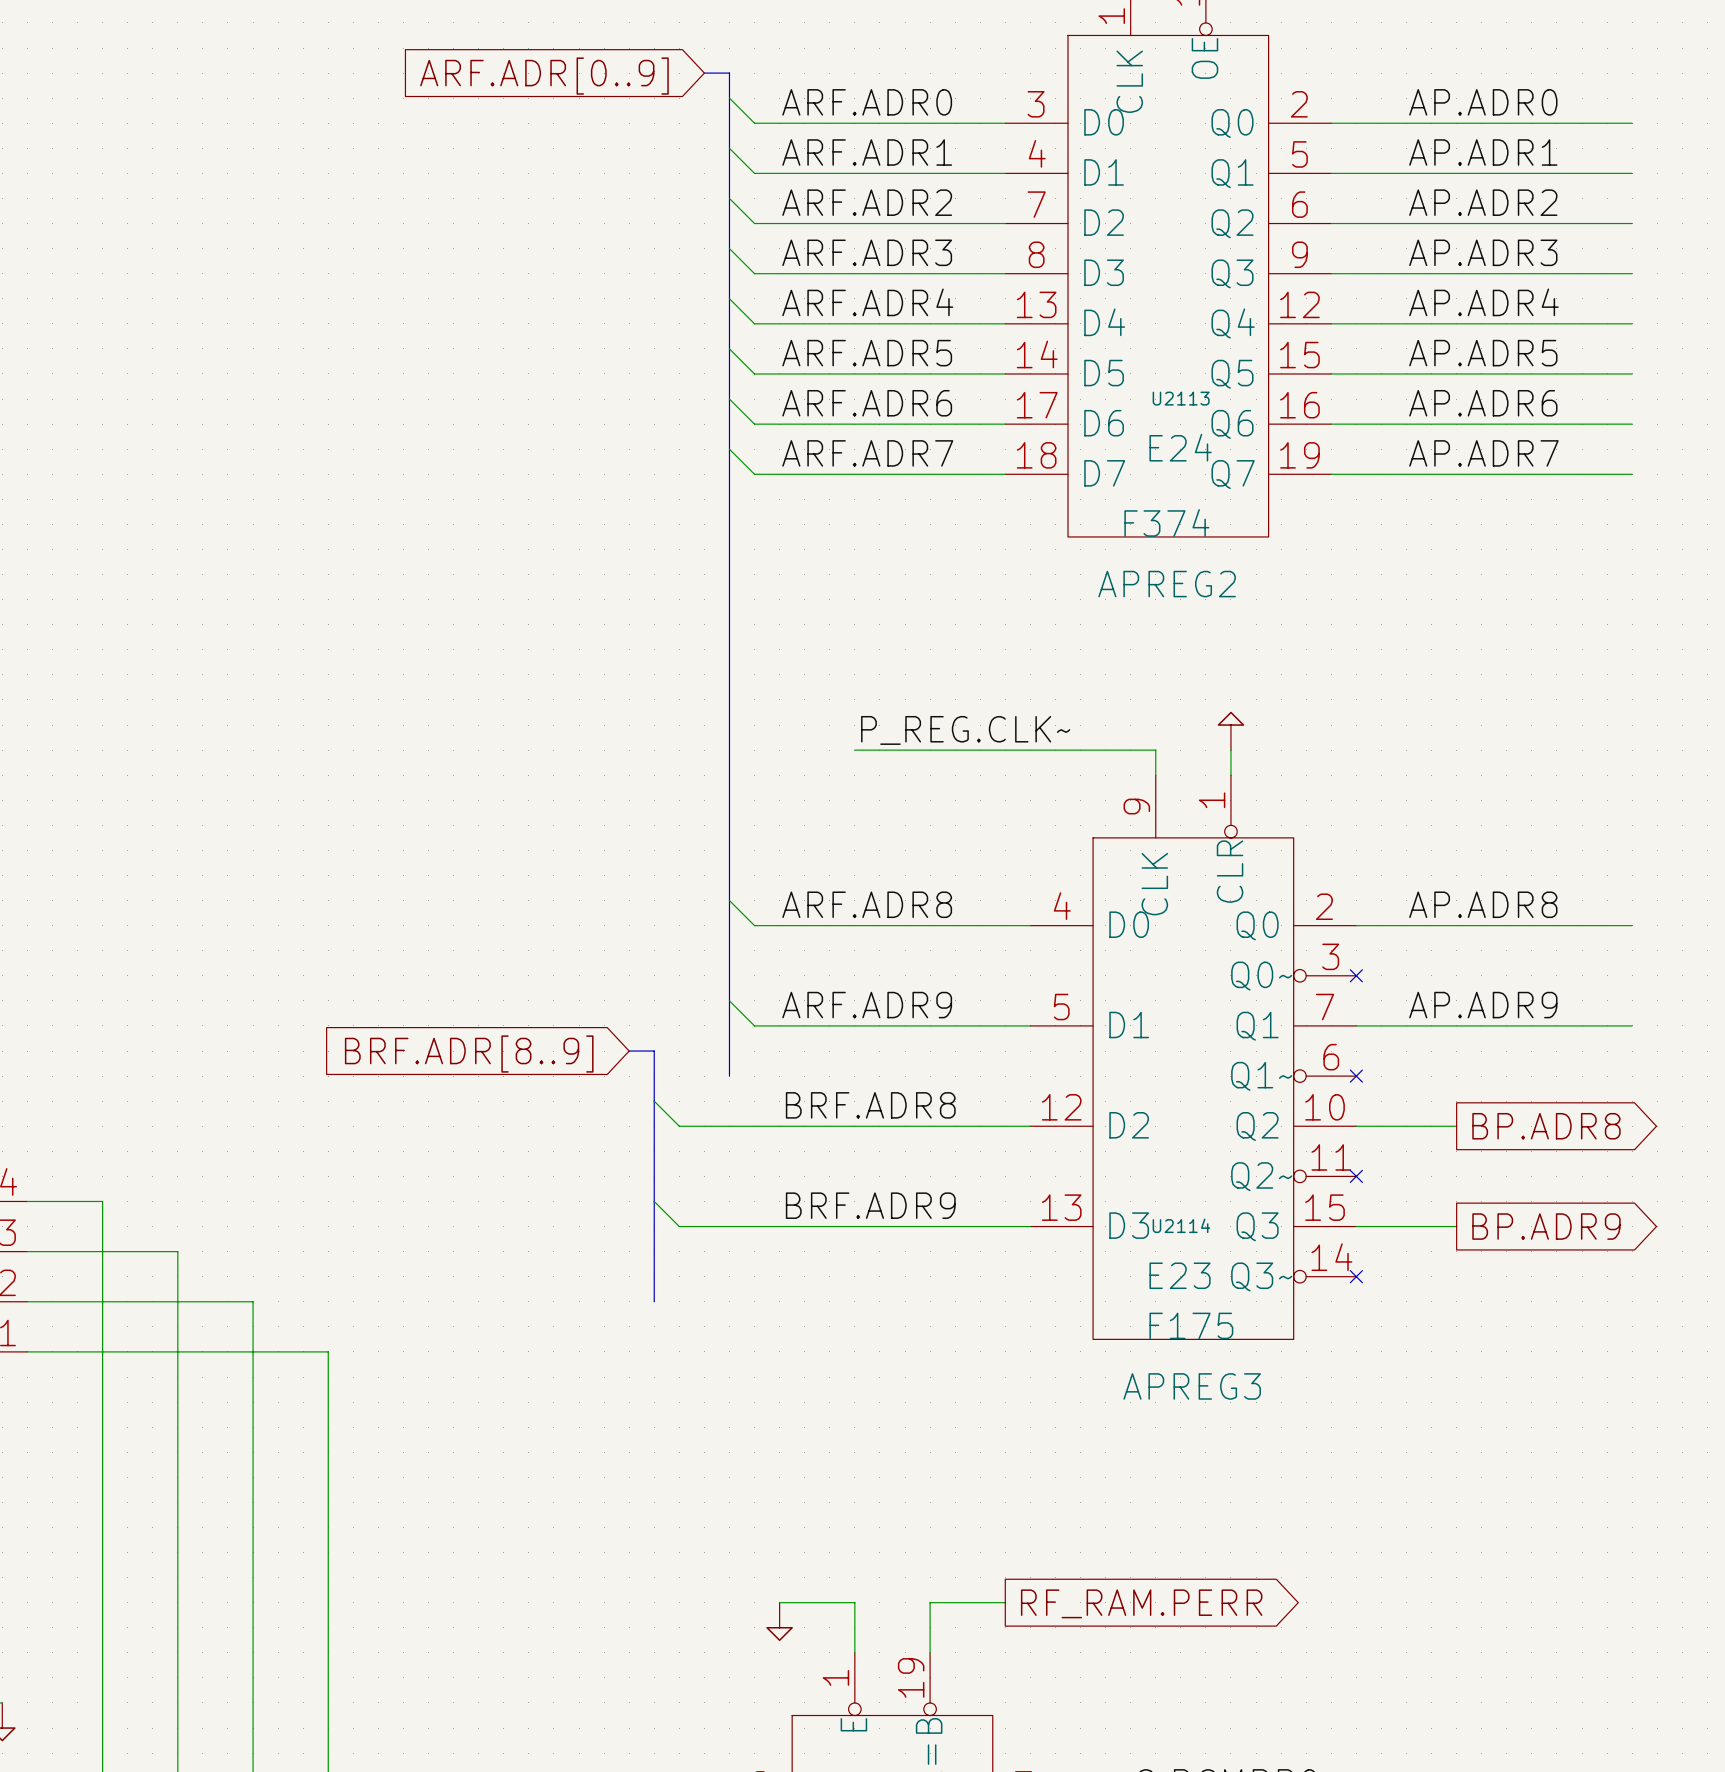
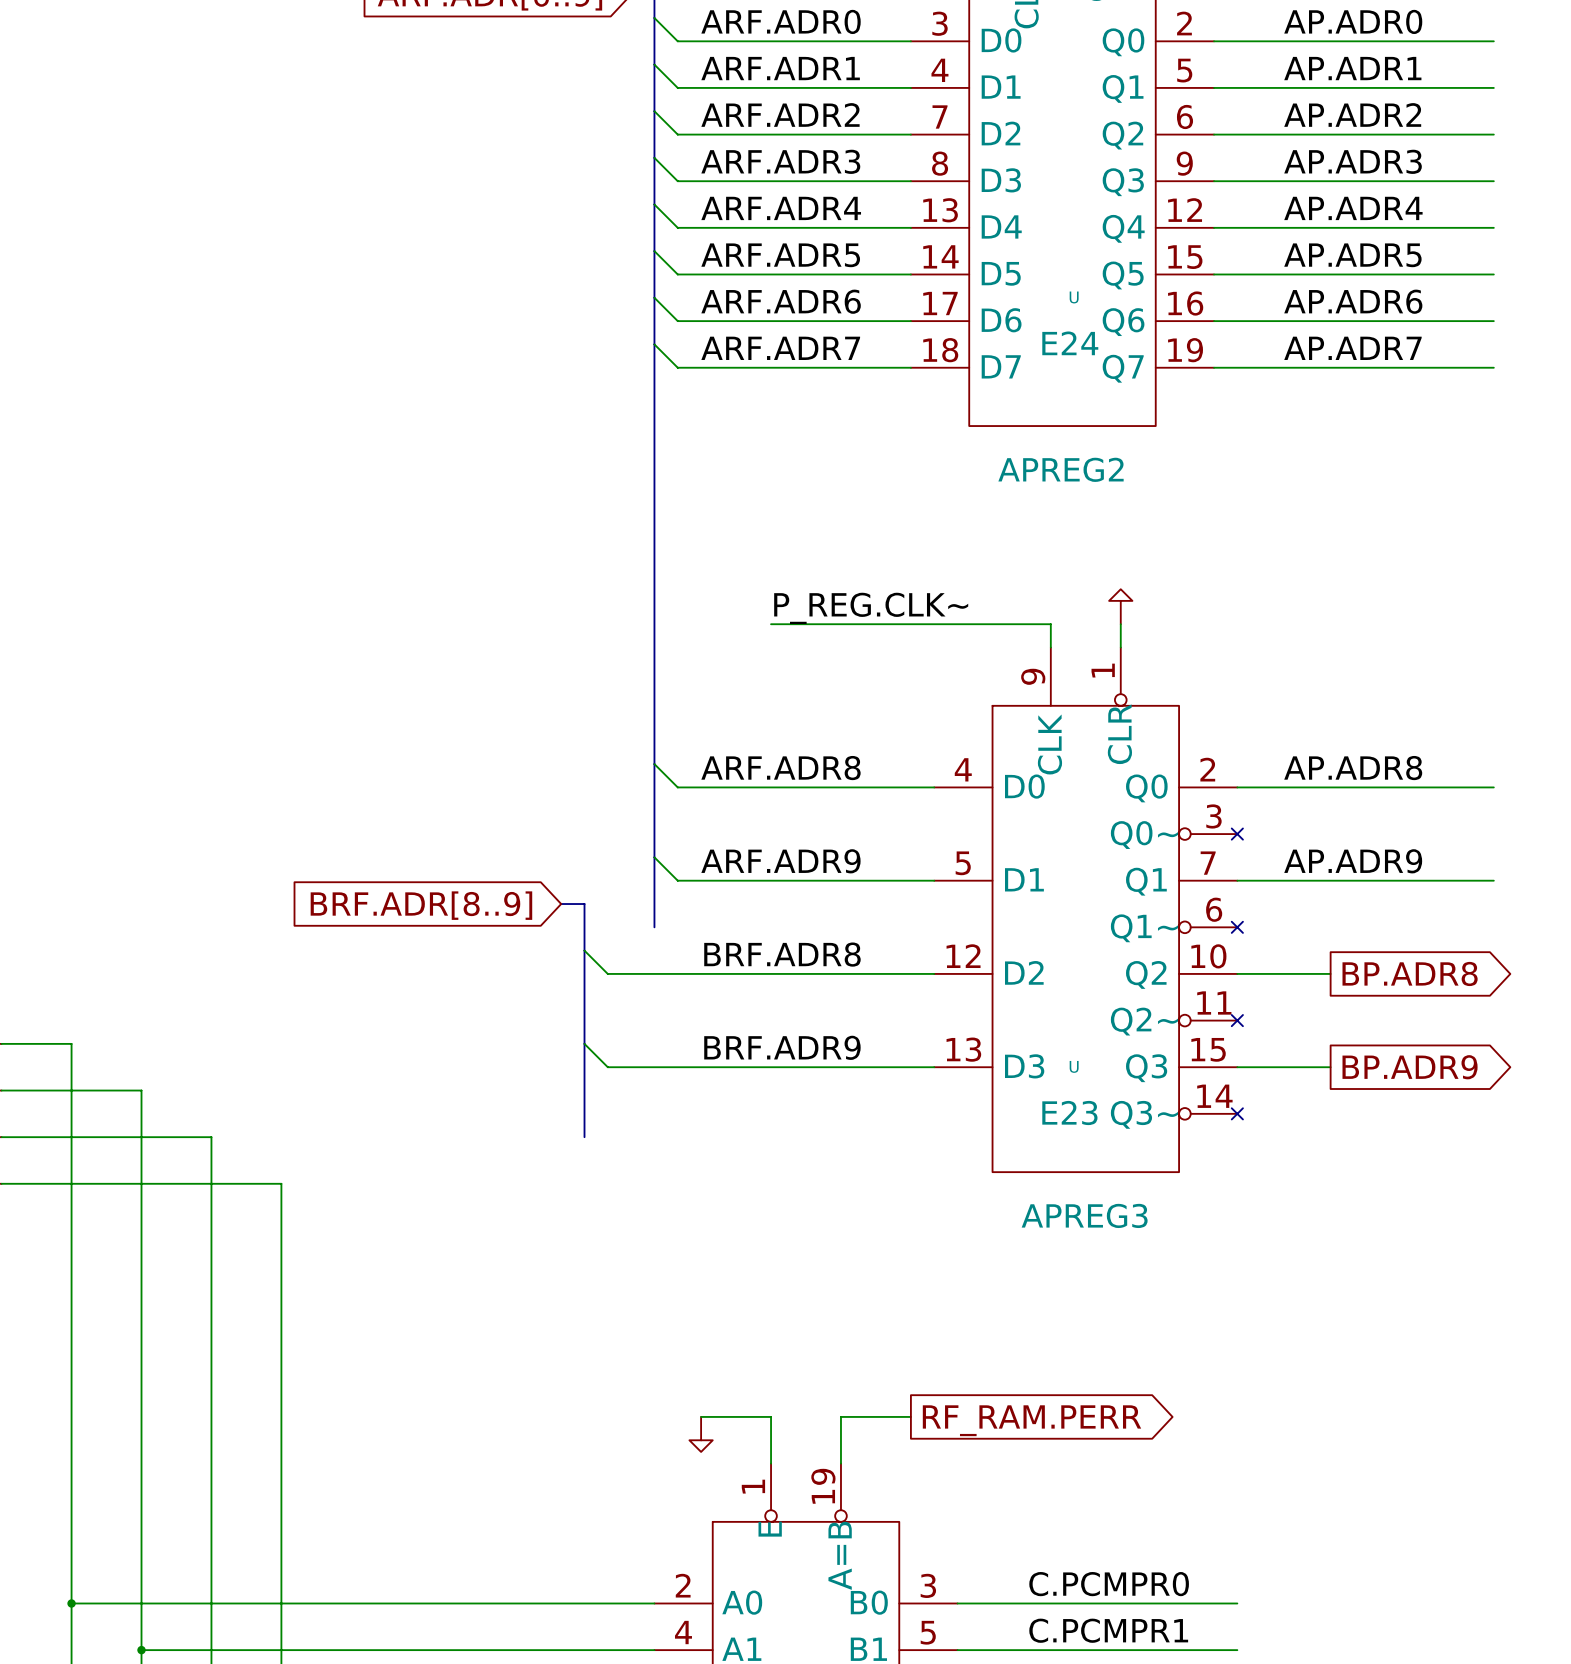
U2113 name: U2113 (1181, 398) -> U (1074, 297)
U2113 value: F374 (1166, 522) -> none
U2114 name: U2114 (1181, 1225) -> U (1074, 1066)
U2114 value: F175 (1191, 1325) -> none

